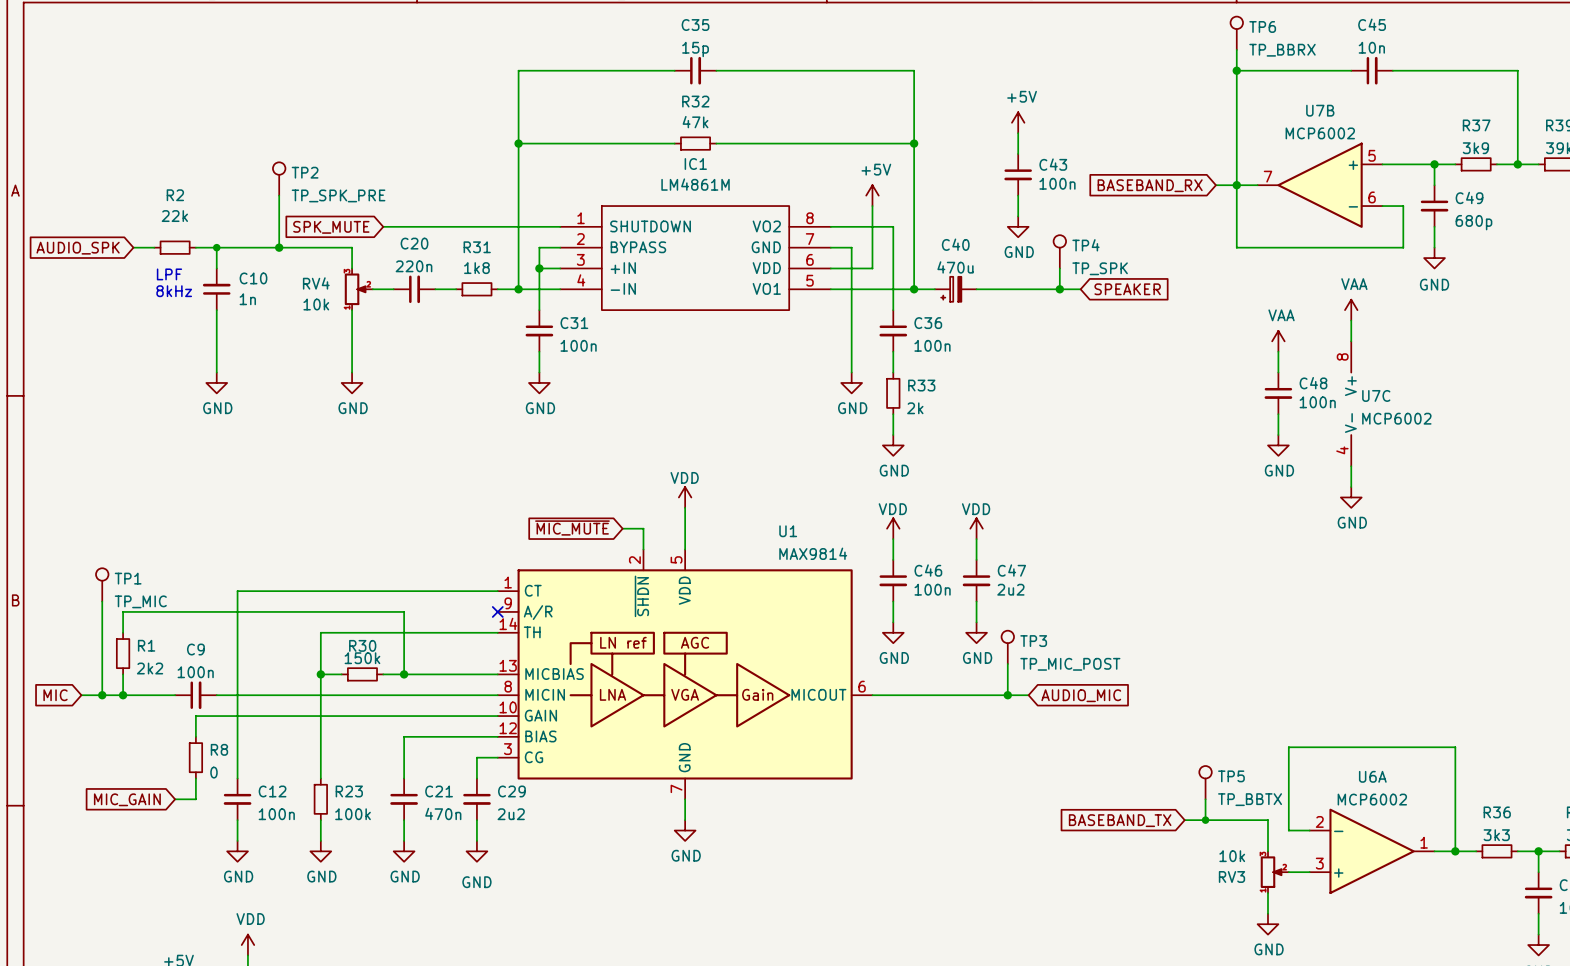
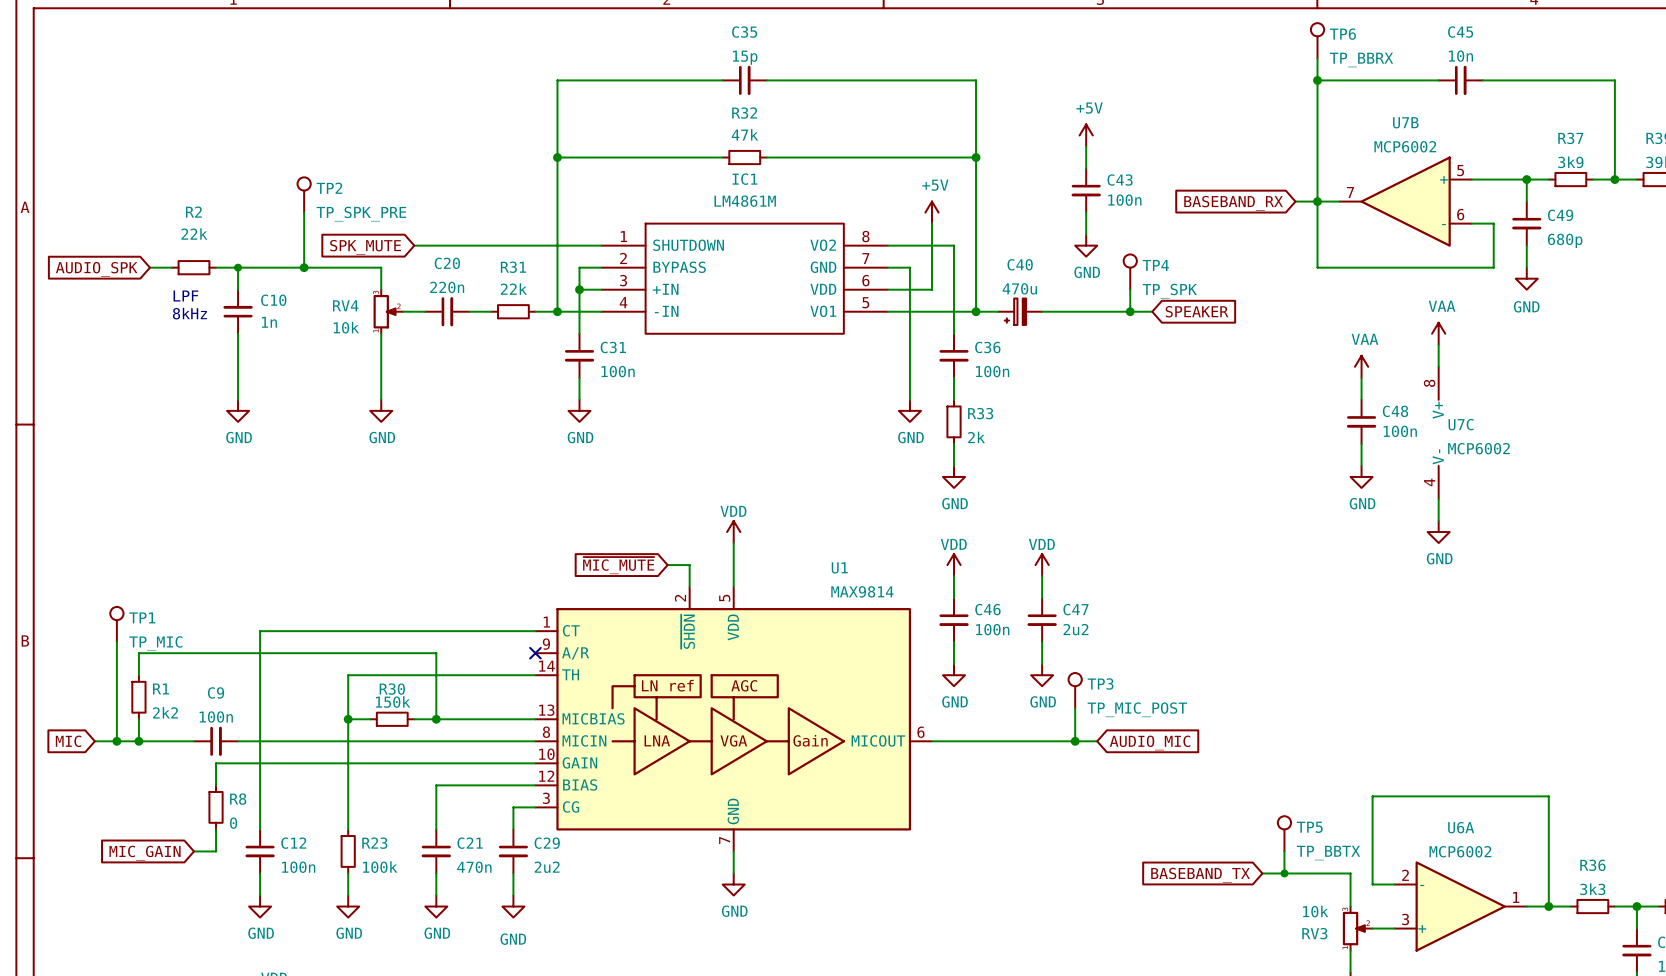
R31 value: 1k8 (476, 268) -> 22k (513, 289)

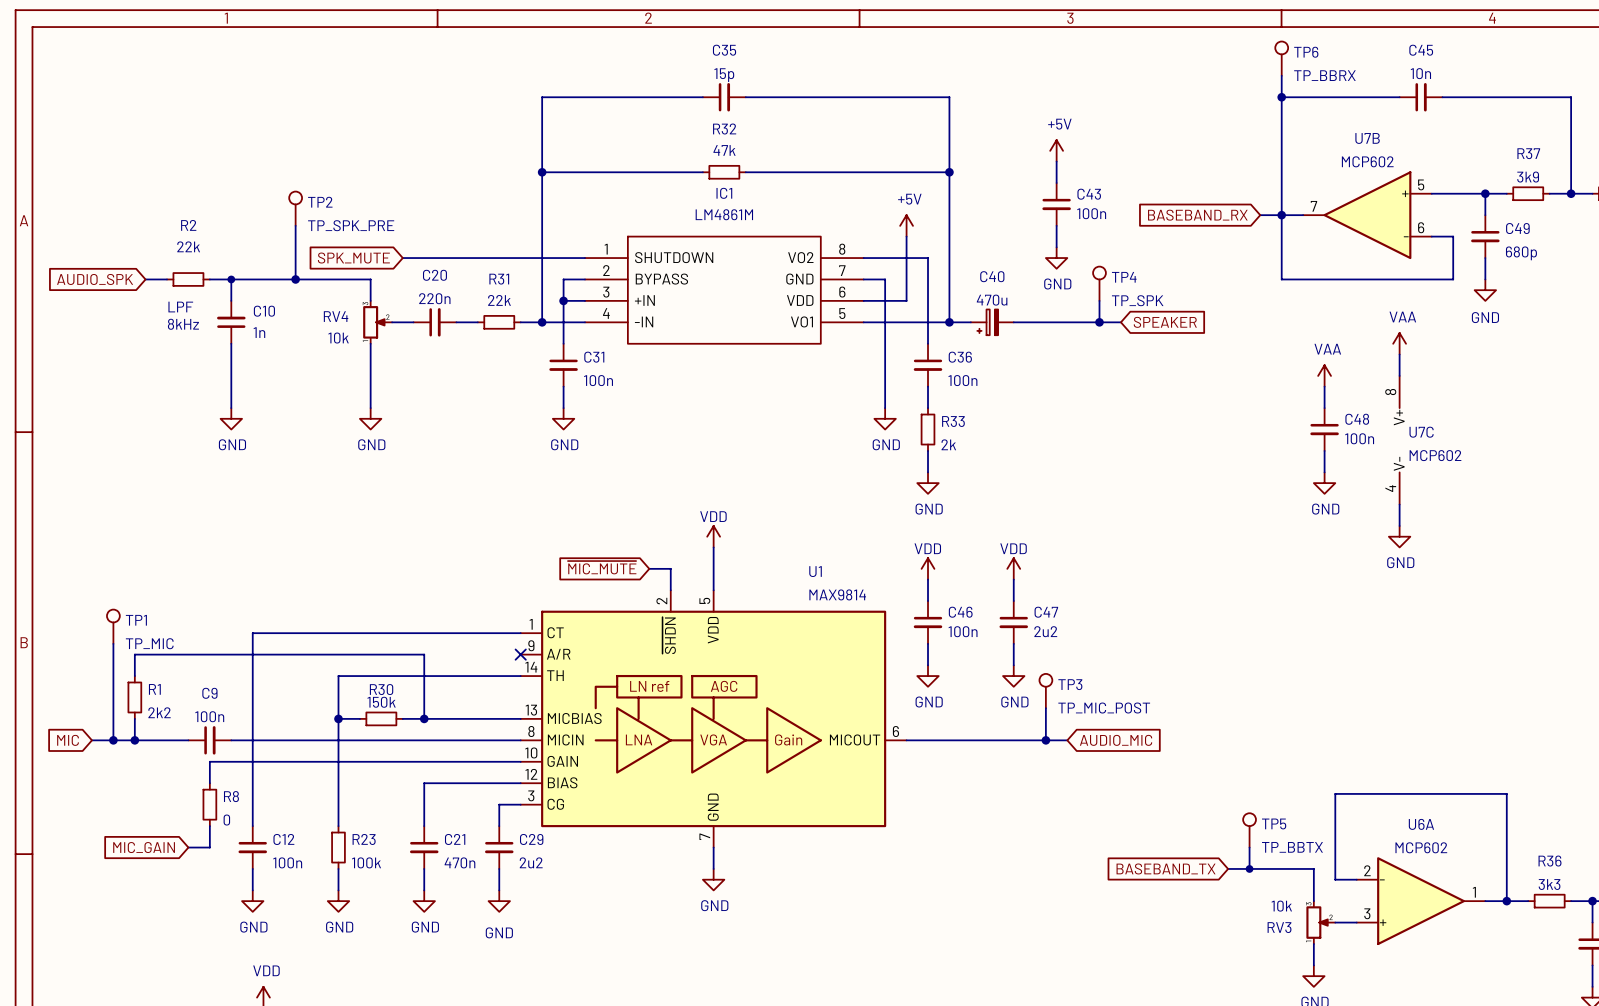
U7B value: MCP6002 (1405, 146) -> MCP602 (1367, 161)
U7C value: MCP6002 (1478, 448) -> MCP602 (1435, 455)
U6A value: MCP6002 (1460, 851) -> MCP602 (1421, 847)

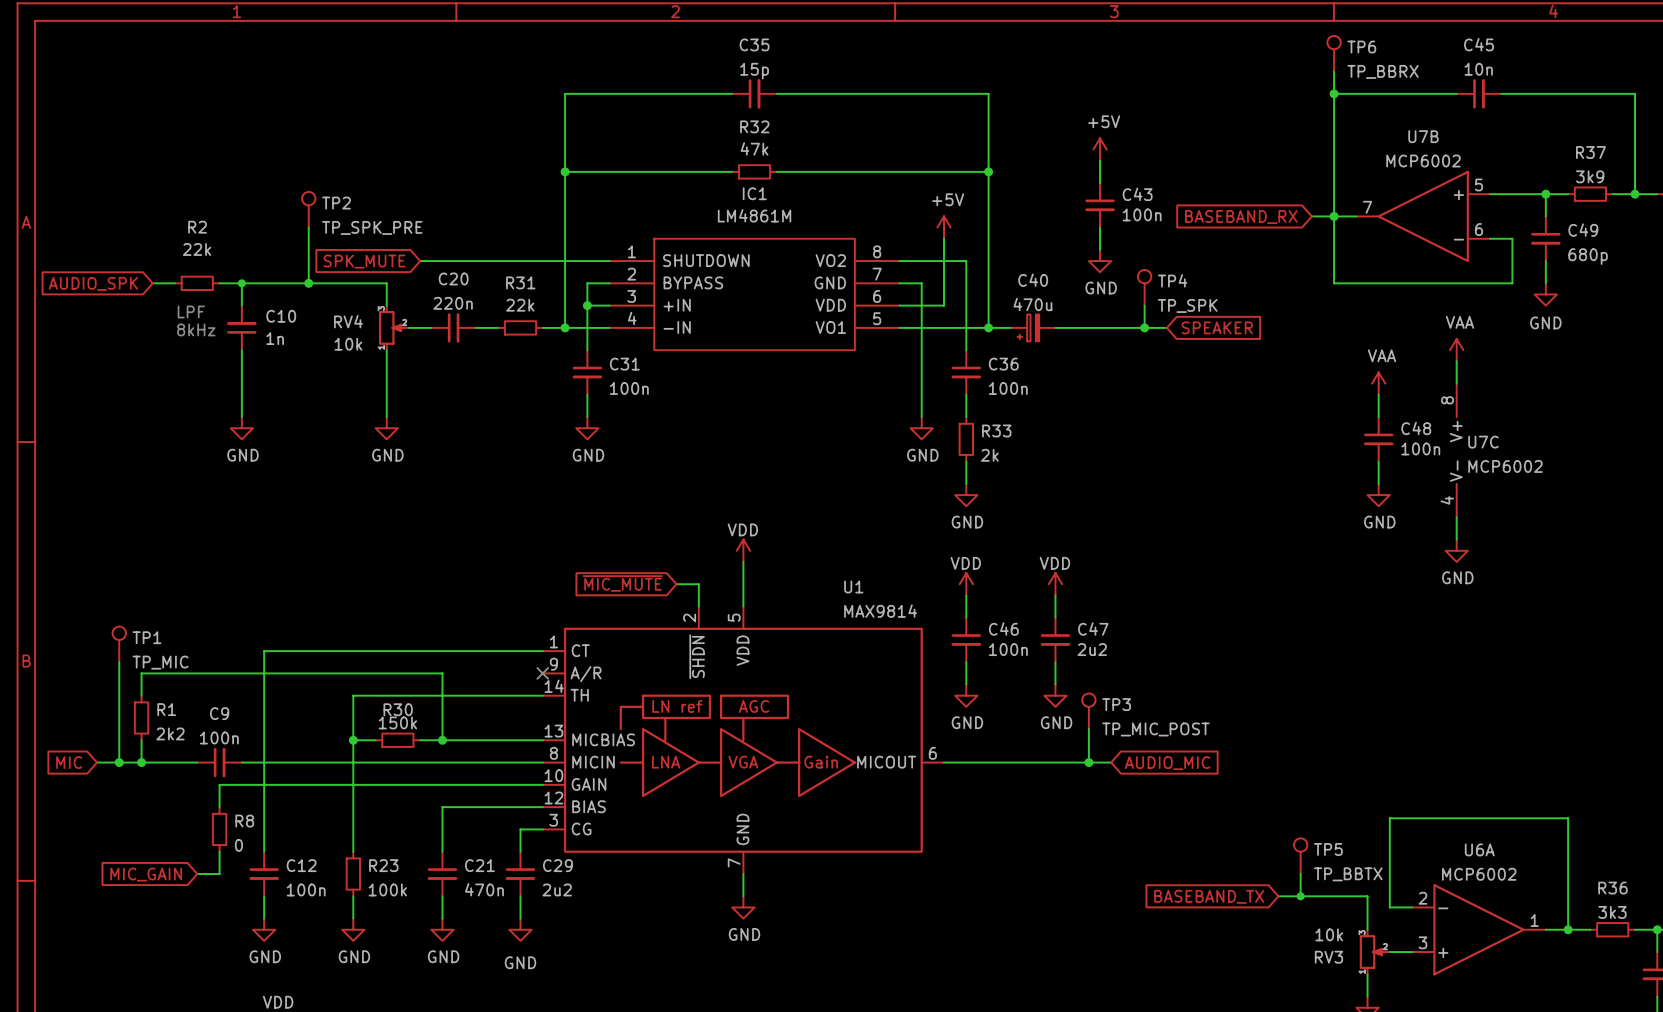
U7B value: MCP602 (1367, 161) -> MCP6002 (1423, 161)
U7C value: MCP602 (1435, 455) -> MCP6002 (1505, 466)
U6A value: MCP602 (1421, 847) -> MCP6002 (1479, 874)

